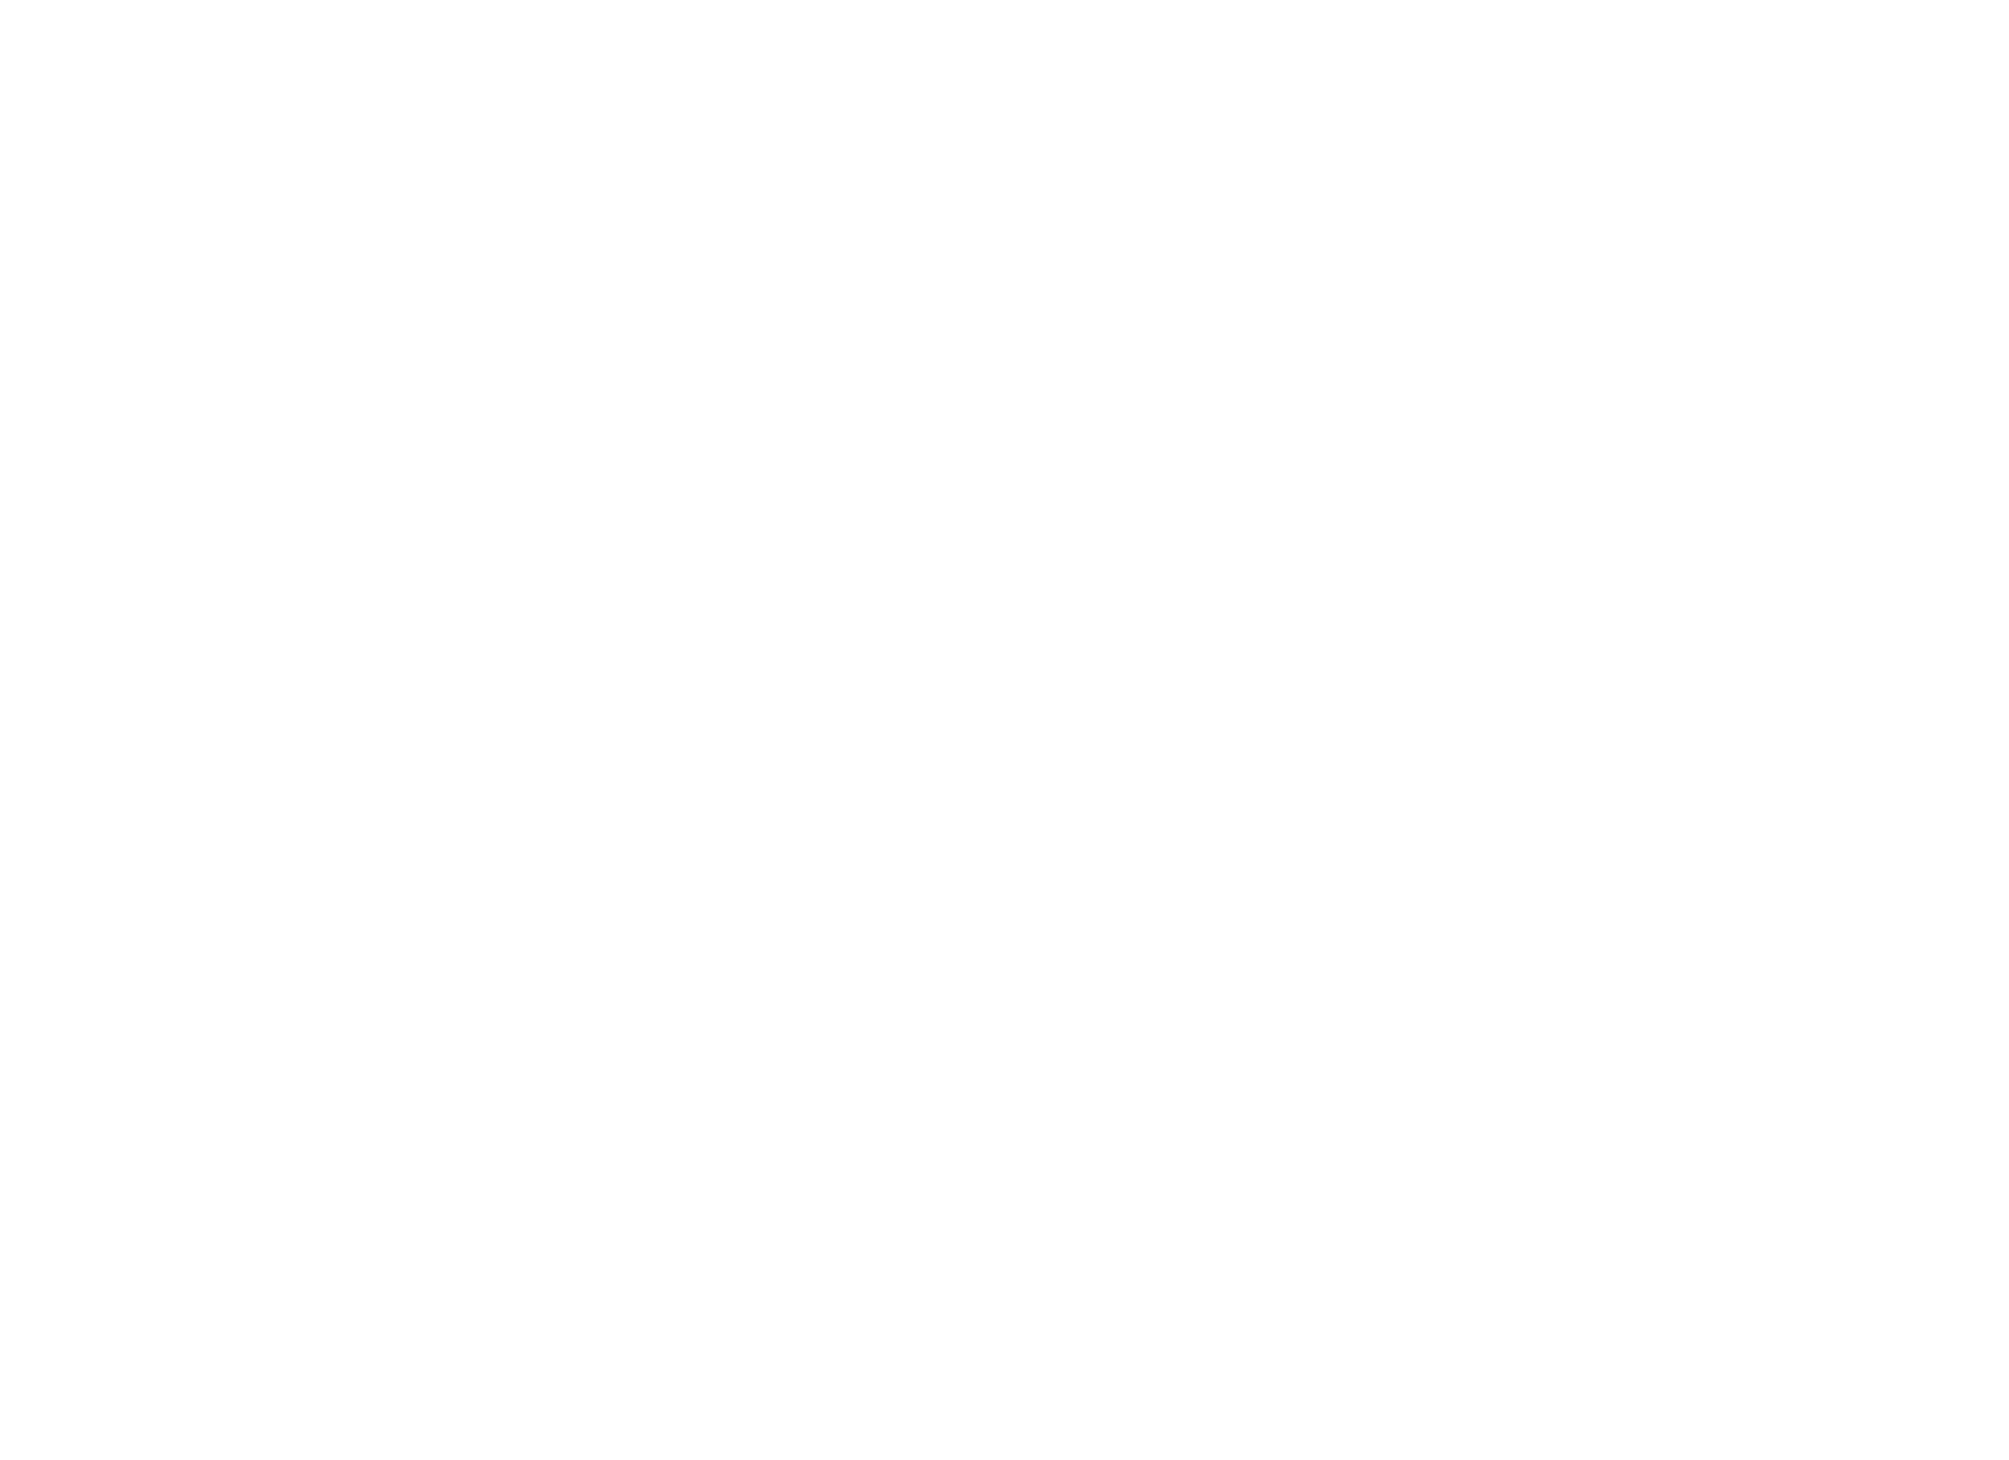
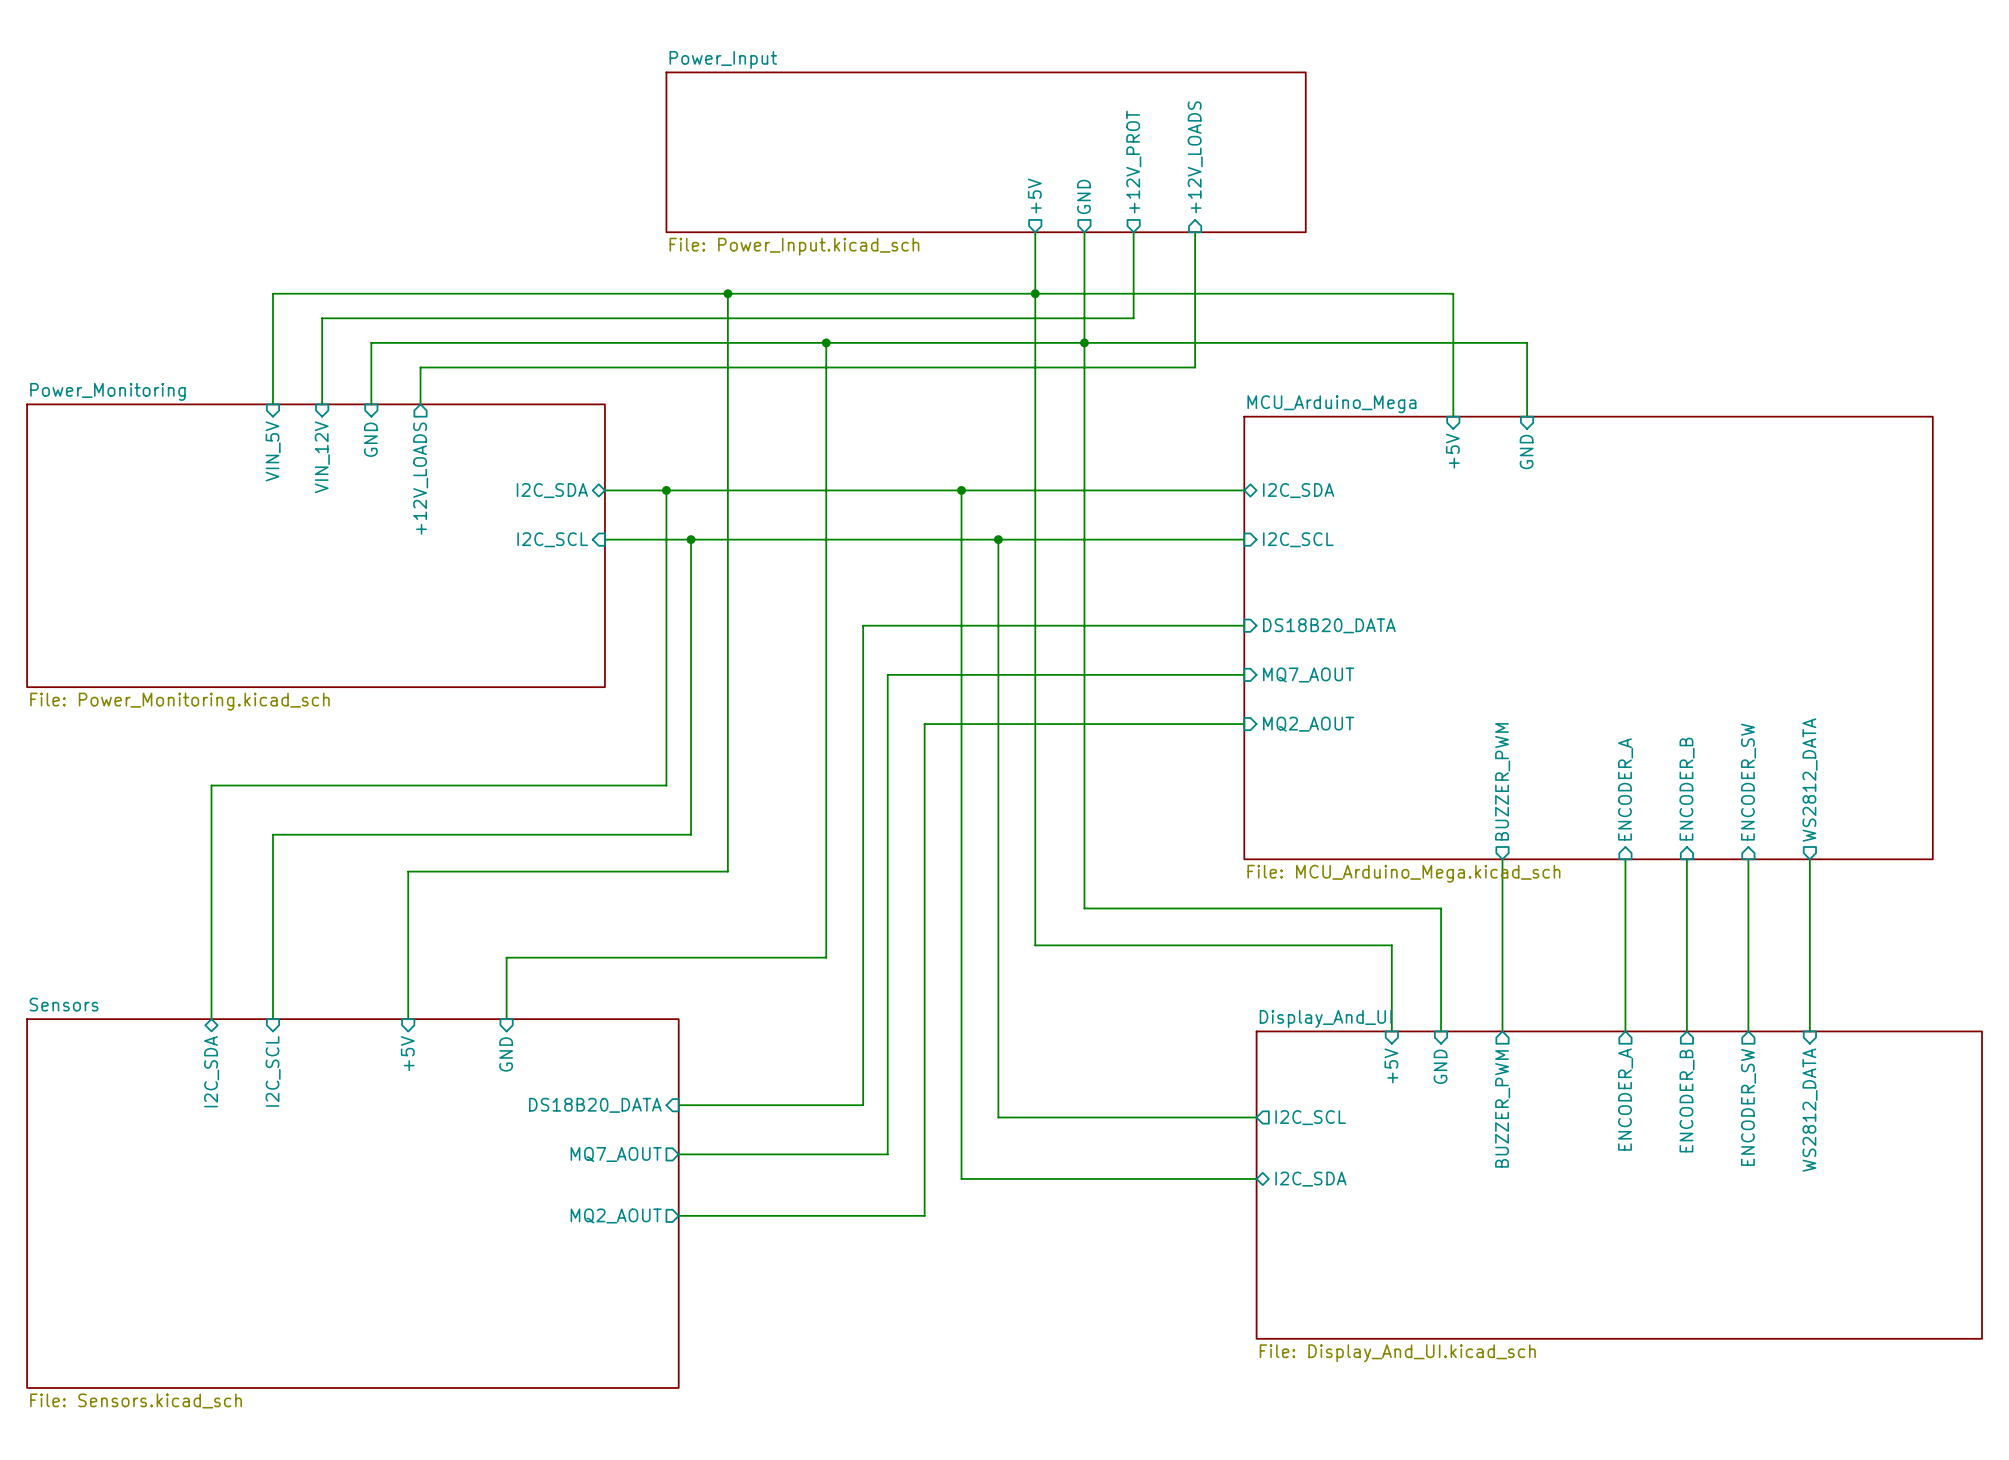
sheet Power_Input: none -> File: Power_Input.kicad_sch (986, 152)
sheet pin: none -> +12V_LOADS (1195, 157)
sheet pin: none -> +12V_PROT (1133, 162)
sheet pin: none -> +5V (1034, 196)
sheet pin: none -> GND (1084, 196)
wire: none -> (1035, 232) (1035, 945) (1391, 945) (1391, 1031)
wire: none -> (1084, 232) (1084, 908) (1441, 908) (1441, 1031)
wire: none -> (1133, 232) (1133, 318) (322, 318) (322, 404)
wire: none -> (1195, 232) (1195, 367) (420, 367) (420, 404)
wire: none -> (727, 293) (727, 871) (408, 871) (408, 1019)
junction: none -> (727, 293)
junction: none -> (1035, 293)
wire: none -> (826, 342) (826, 957) (506, 957) (506, 1019)
junction: none -> (826, 342)
junction: none -> (1084, 342)
wire: none -> (272, 404) (272, 293) (1453, 293) (1453, 416)
wire: none -> (371, 404) (371, 342) (1527, 342) (1527, 416)
sheet pin: none -> GND (370, 439)
sheet pin: none -> VIN_5V (273, 451)
sheet pin: none -> +5V (1452, 451)
sheet pin: none -> GND (1526, 451)
sheet pin: none -> VIN_12V (322, 457)
sheet pin: none -> +12V_LOADS (420, 478)
sheet pin: none -> I2C_SDA (552, 490)
wire: none -> (604, 490) (1244, 490)
wire: none -> (666, 490) (666, 785) (211, 785) (211, 1019)
junction: none -> (666, 490)
wire: none -> (961, 490) (961, 1178) (1256, 1178)
junction: none -> (961, 490)
sheet pin: none -> I2C_SDA (1298, 490)
sheet pin: none -> I2C_SCL (552, 539)
wire: none -> (604, 539) (1244, 539)
wire: none -> (691, 539) (691, 834) (272, 834) (272, 1019)
junction: none -> (691, 539)
wire: none -> (998, 539) (998, 1117) (1256, 1117)
junction: none -> (998, 539)
sheet pin: none -> I2C_SCL (1298, 539)
sheet Power_Monitoring: none -> File: Power_Monitoring.kicad_sch (316, 545)
wire: none -> (1244, 625) (863, 625) (863, 1105) (678, 1105)
sheet pin: none -> DS18B20_DATA (1329, 625)
sheet MCU_Arduino_Mega: none -> File: MCU_Arduino_Mega.kicad_sch (1588, 637)
wire: none -> (1244, 674) (887, 674) (887, 1154) (678, 1154)
sheet pin: none -> MQ7_AOUT (1308, 675)
wire: none -> (1244, 724) (924, 724) (924, 1215) (678, 1215)
sheet pin: none -> MQ2_AOUT (1308, 724)
sheet pin: none -> WS2812_DATA (1810, 780)
sheet pin: none -> BUZZER_PWM (1502, 781)
sheet pin: none -> ENCODER_SW (1748, 782)
sheet pin: none -> ENCODER_A (1625, 789)
sheet pin: none -> ENCODER_B (1687, 789)
wire: none -> (1502, 859) (1502, 1031)
wire: none -> (1625, 859) (1625, 1031)
wire: none -> (1686, 859) (1686, 1031)
wire: none -> (1748, 859) (1748, 1031)
wire: none -> (1809, 859) (1809, 1031)
sheet pin: none -> +5V (407, 1053)
sheet pin: none -> GND (506, 1054)
sheet pin: none -> +5V (1391, 1065)
sheet pin: none -> GND (1440, 1066)
sheet pin: none -> I2C_SDA (211, 1071)
sheet pin: none -> I2C_SCL (273, 1071)
sheet pin: none -> ENCODER_A (1625, 1099)
sheet pin: none -> ENCODER_B (1687, 1101)
sheet pin: none -> DS18B20_DATA (595, 1105)
sheet pin: none -> ENCODER_SW (1748, 1107)
sheet pin: none -> BUZZER_PWM (1502, 1108)
sheet pin: none -> WS2812_DATA (1810, 1110)
sheet pin: none -> I2C_SCL (1310, 1117)
sheet pin: none -> MQ7_AOUT (616, 1154)
sheet pin: none -> I2C_SDA (1310, 1179)
sheet Display_And_UI: none -> File: Display_And_UI.kicad_sch (1619, 1185)
sheet Sensors: none -> File: Sensors.kicad_sch (352, 1203)
sheet pin: none -> MQ2_AOUT (616, 1215)

